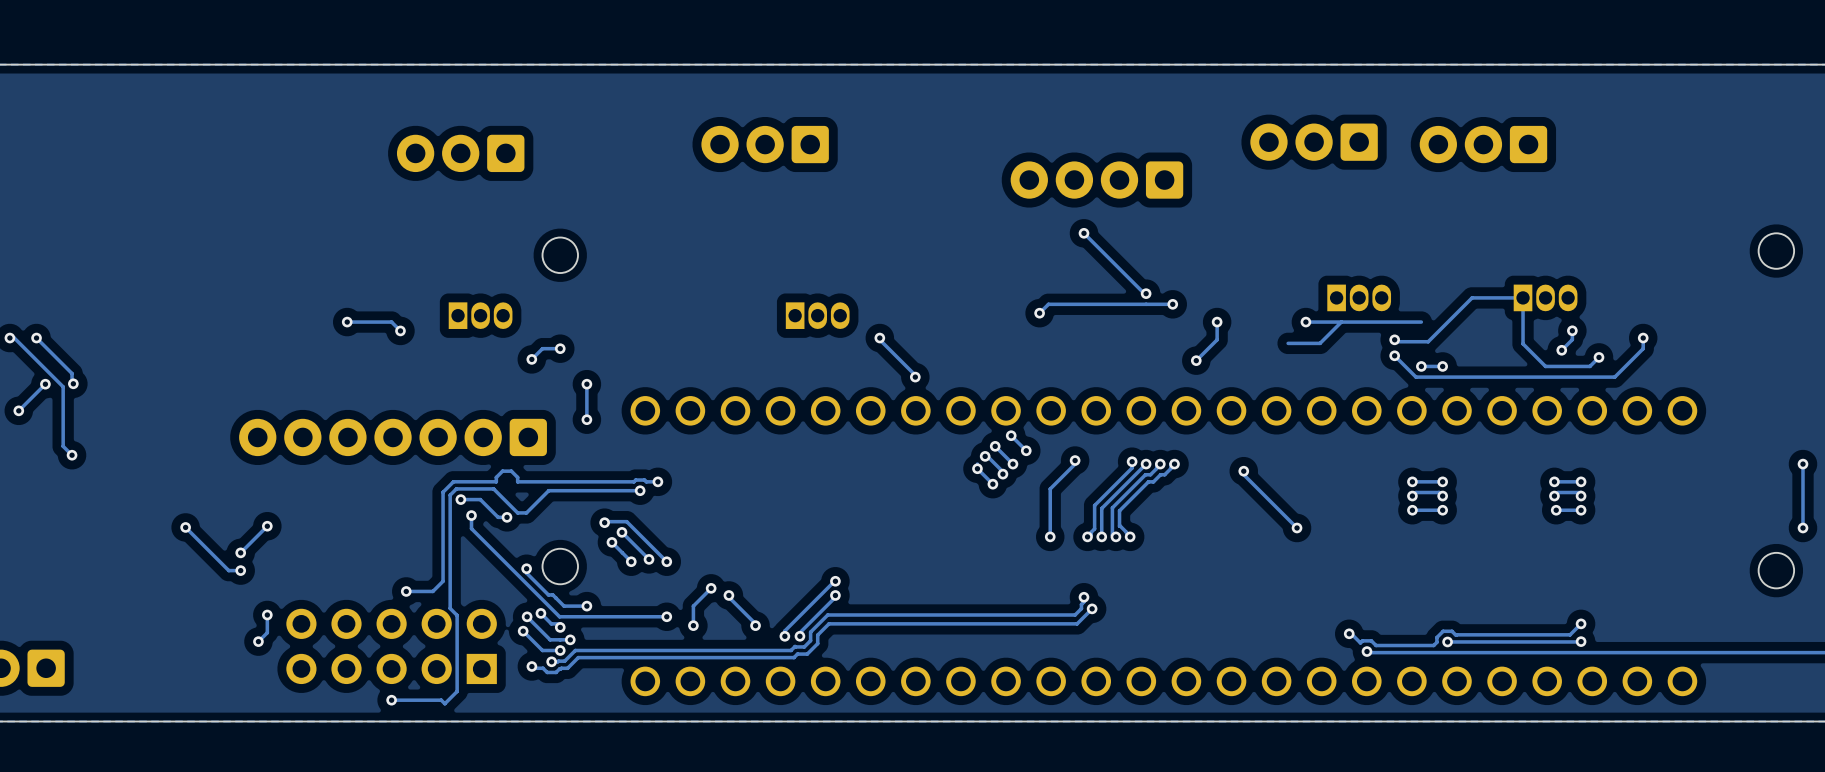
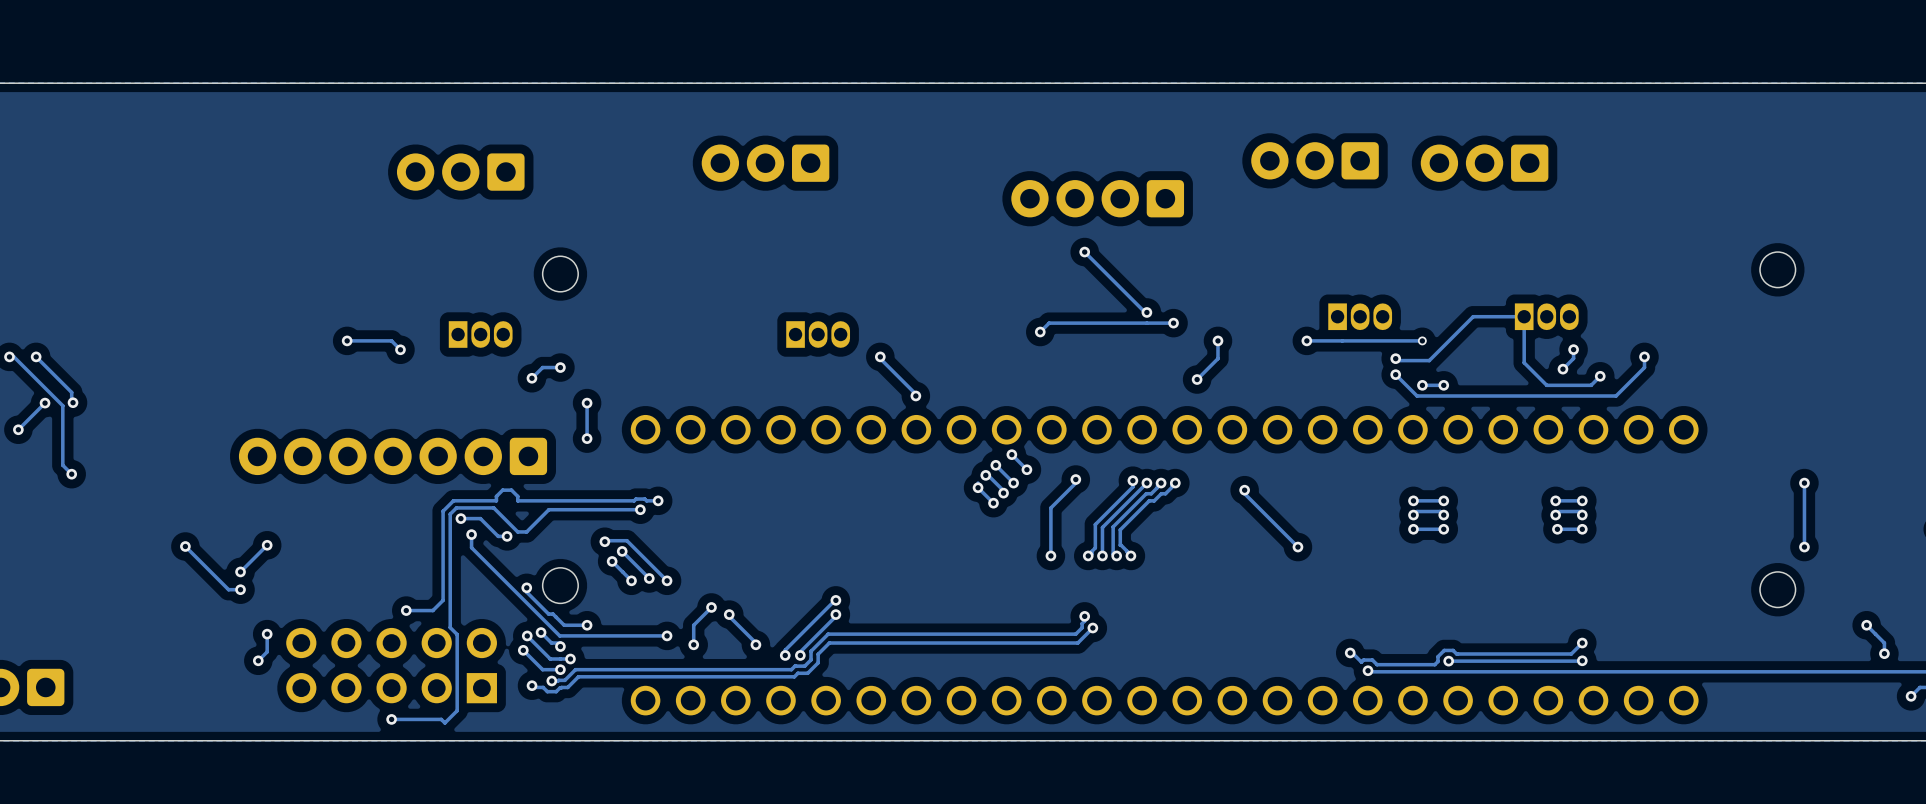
track: (1341, 322) (1320, 343) (1288, 343) -> none
via: none -> (1422, 340)

